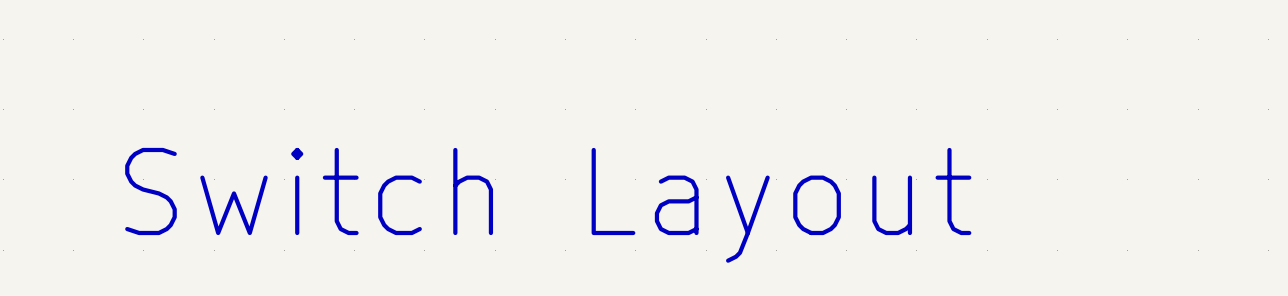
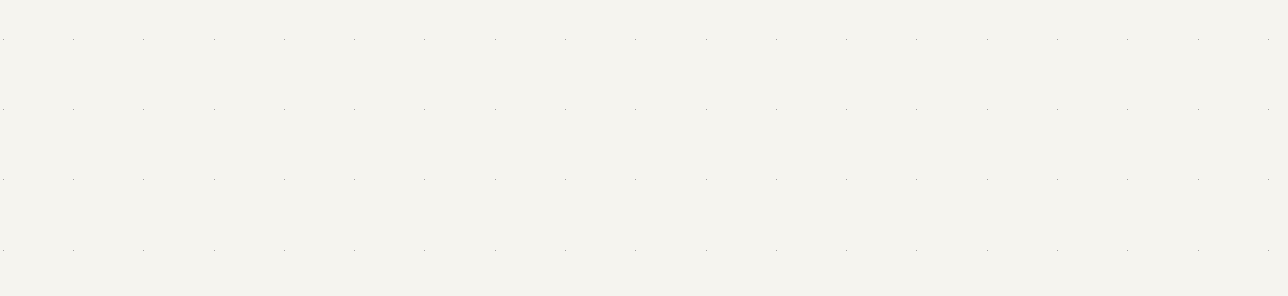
text: Switch Layout (548, 205) -> none

